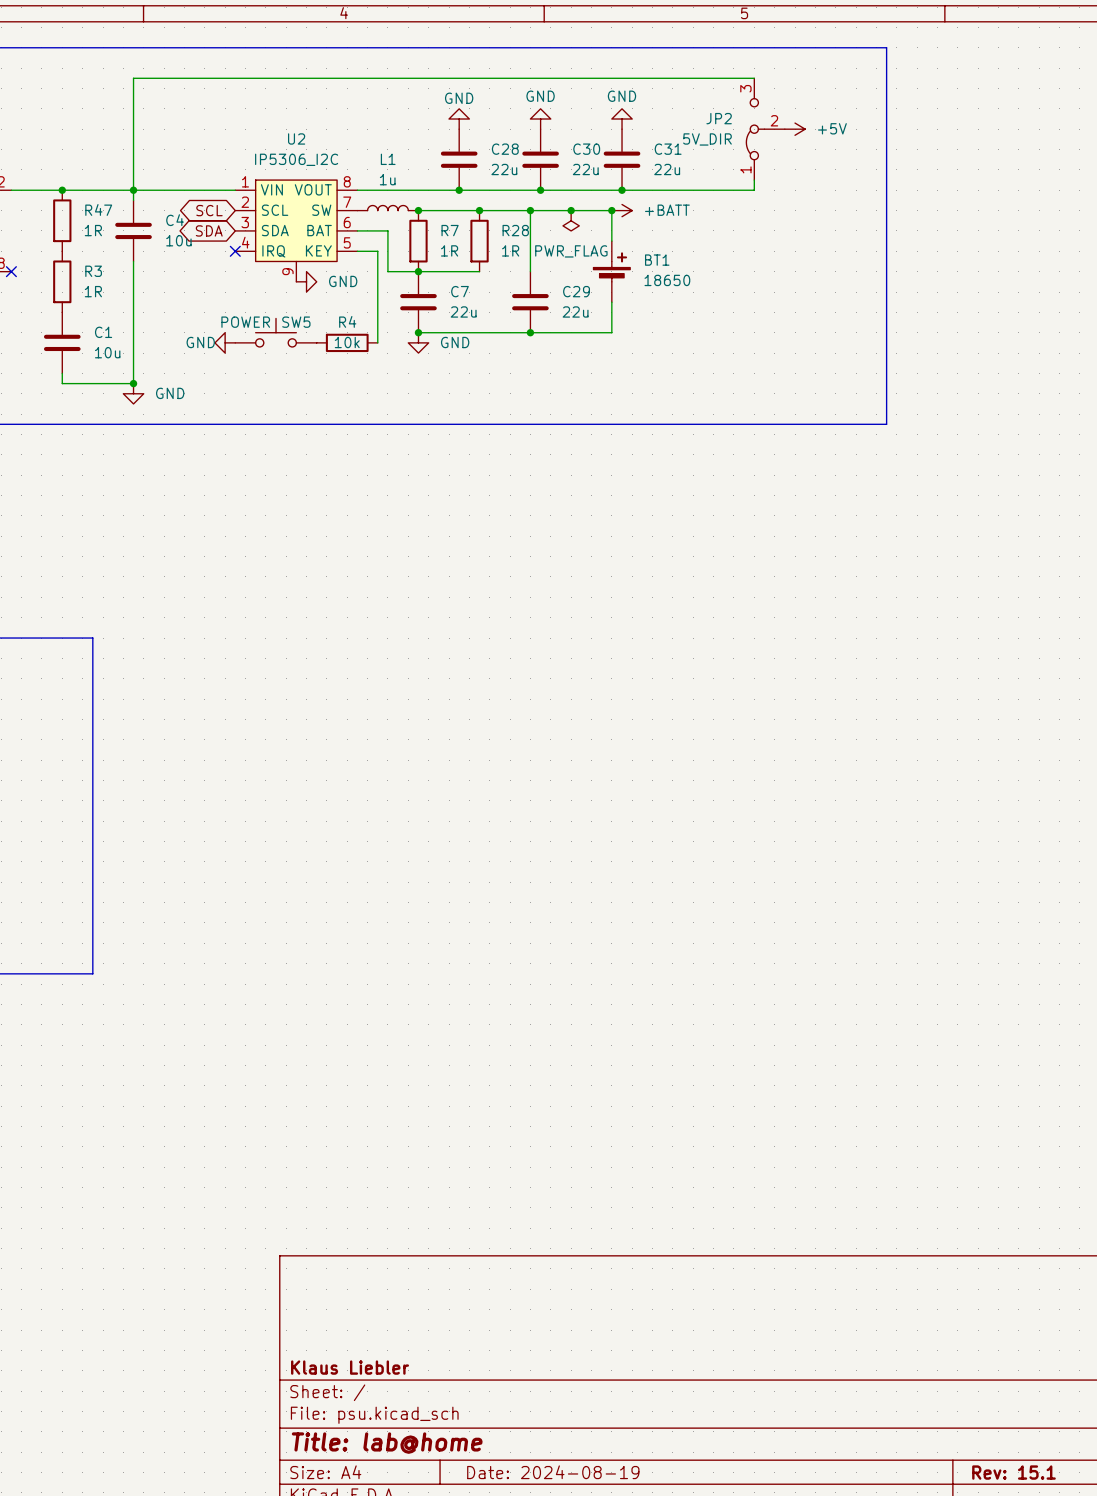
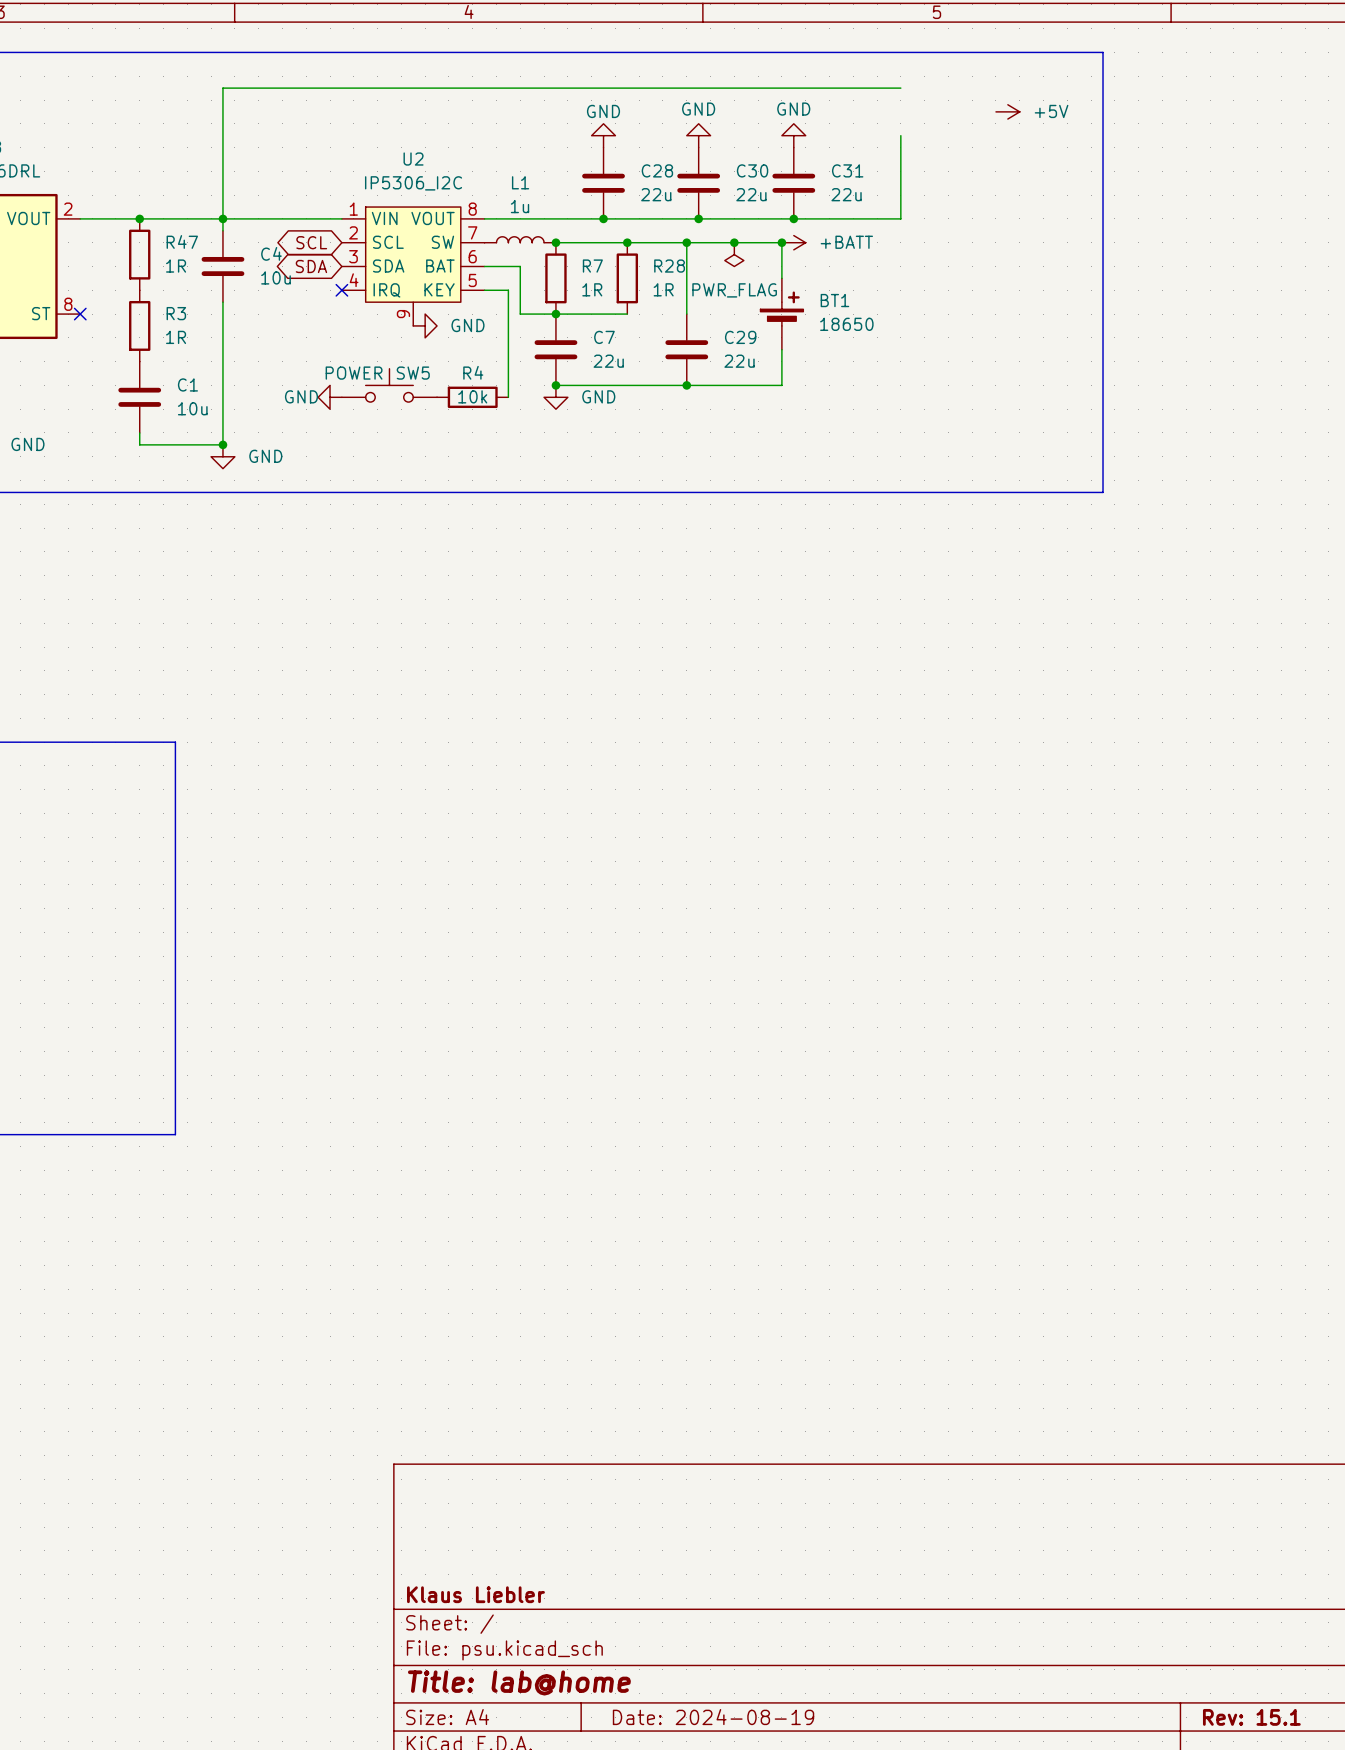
wire: (713, 78) (754, 78) -> none
JP2: 5V_DIR (765, 129) -> none
power symbol position: +5V (795, 129) -> +5V (1007, 111)
wire: (754, 180) (754, 190) (713, 190) -> (900, 135) (900, 218)

